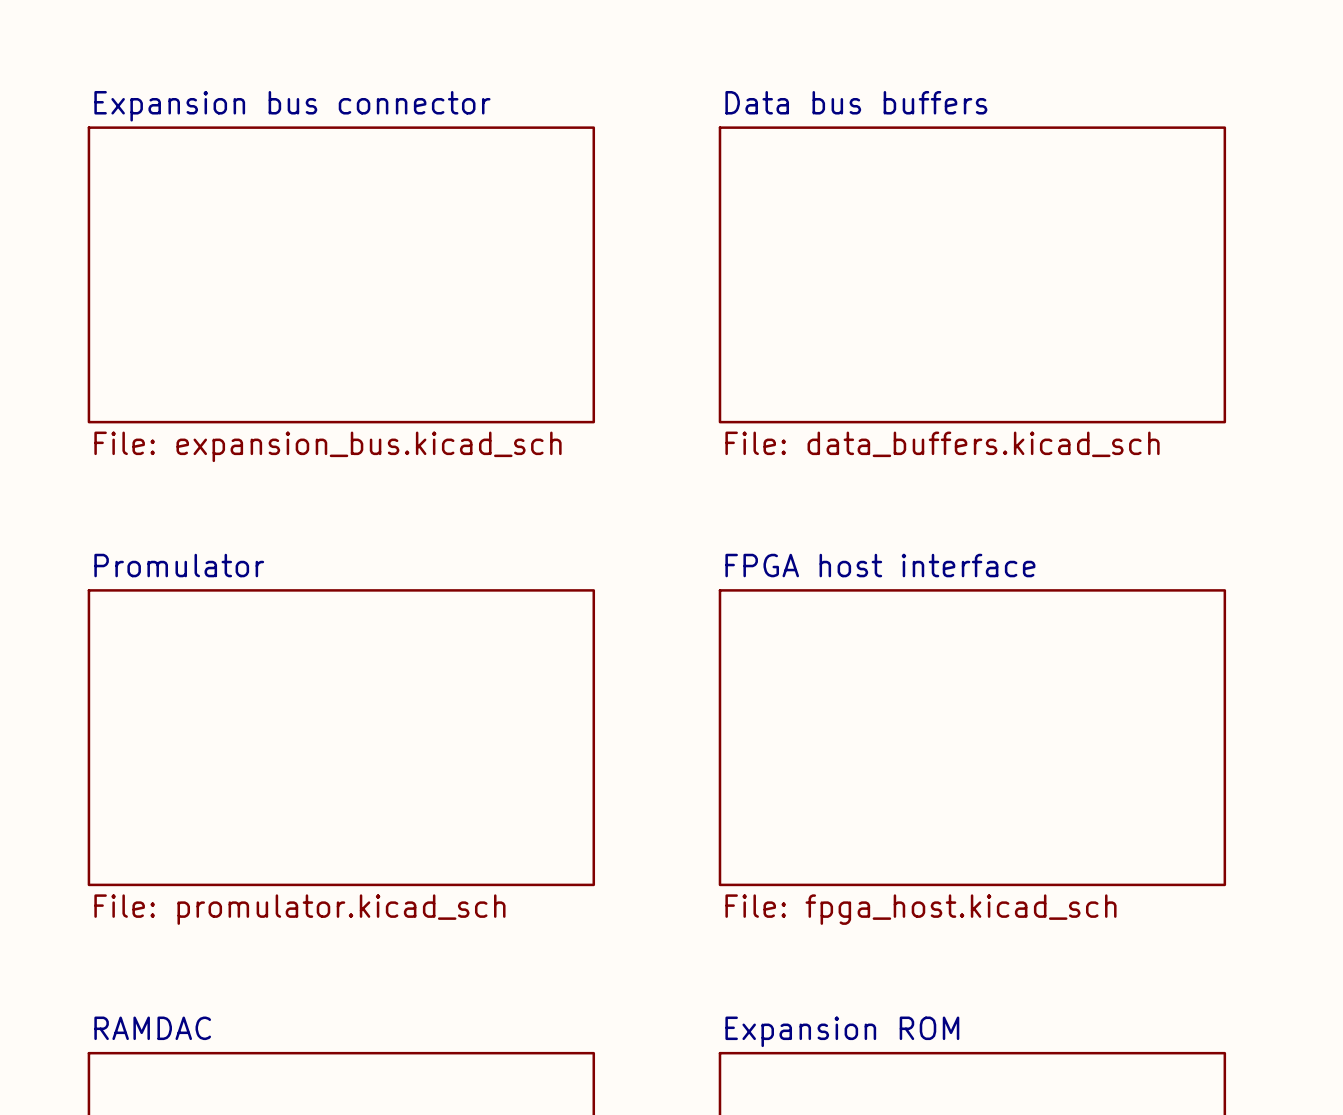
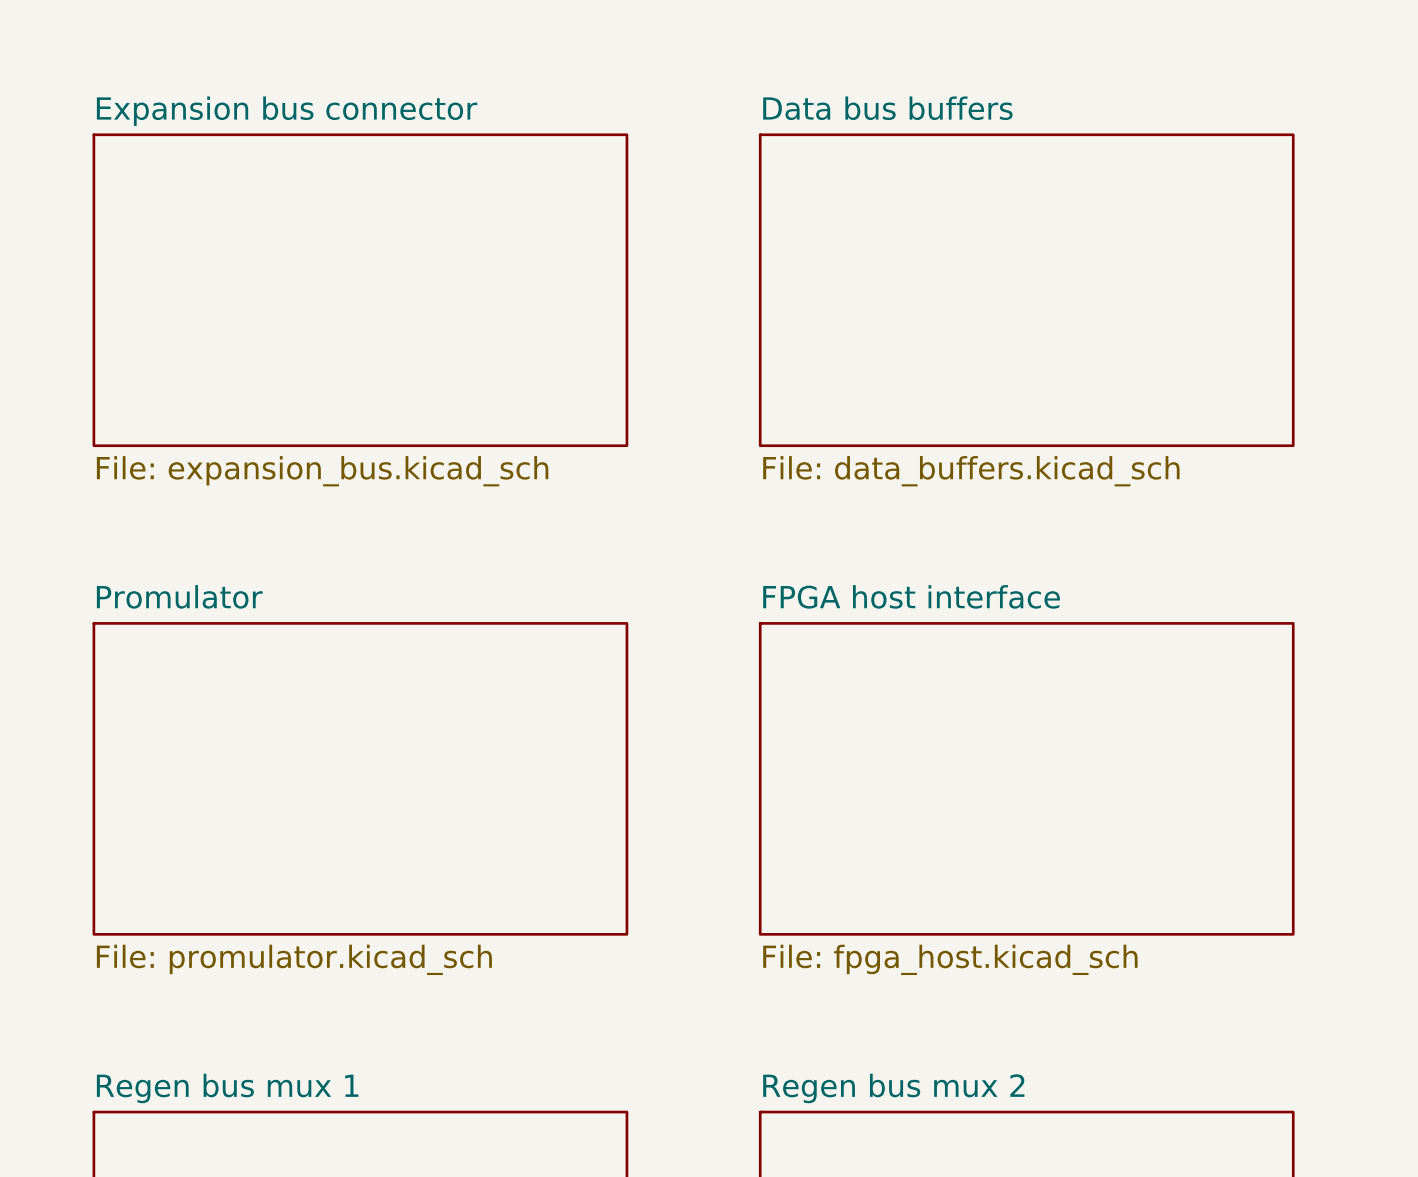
sheet RAMDAC name: RAMDAC (152, 1028) -> Regen bus mux 1 (227, 1088)
sheet Expansion ROM name: Expansion ROM (842, 1031) -> Regen bus mux 2 (893, 1088)

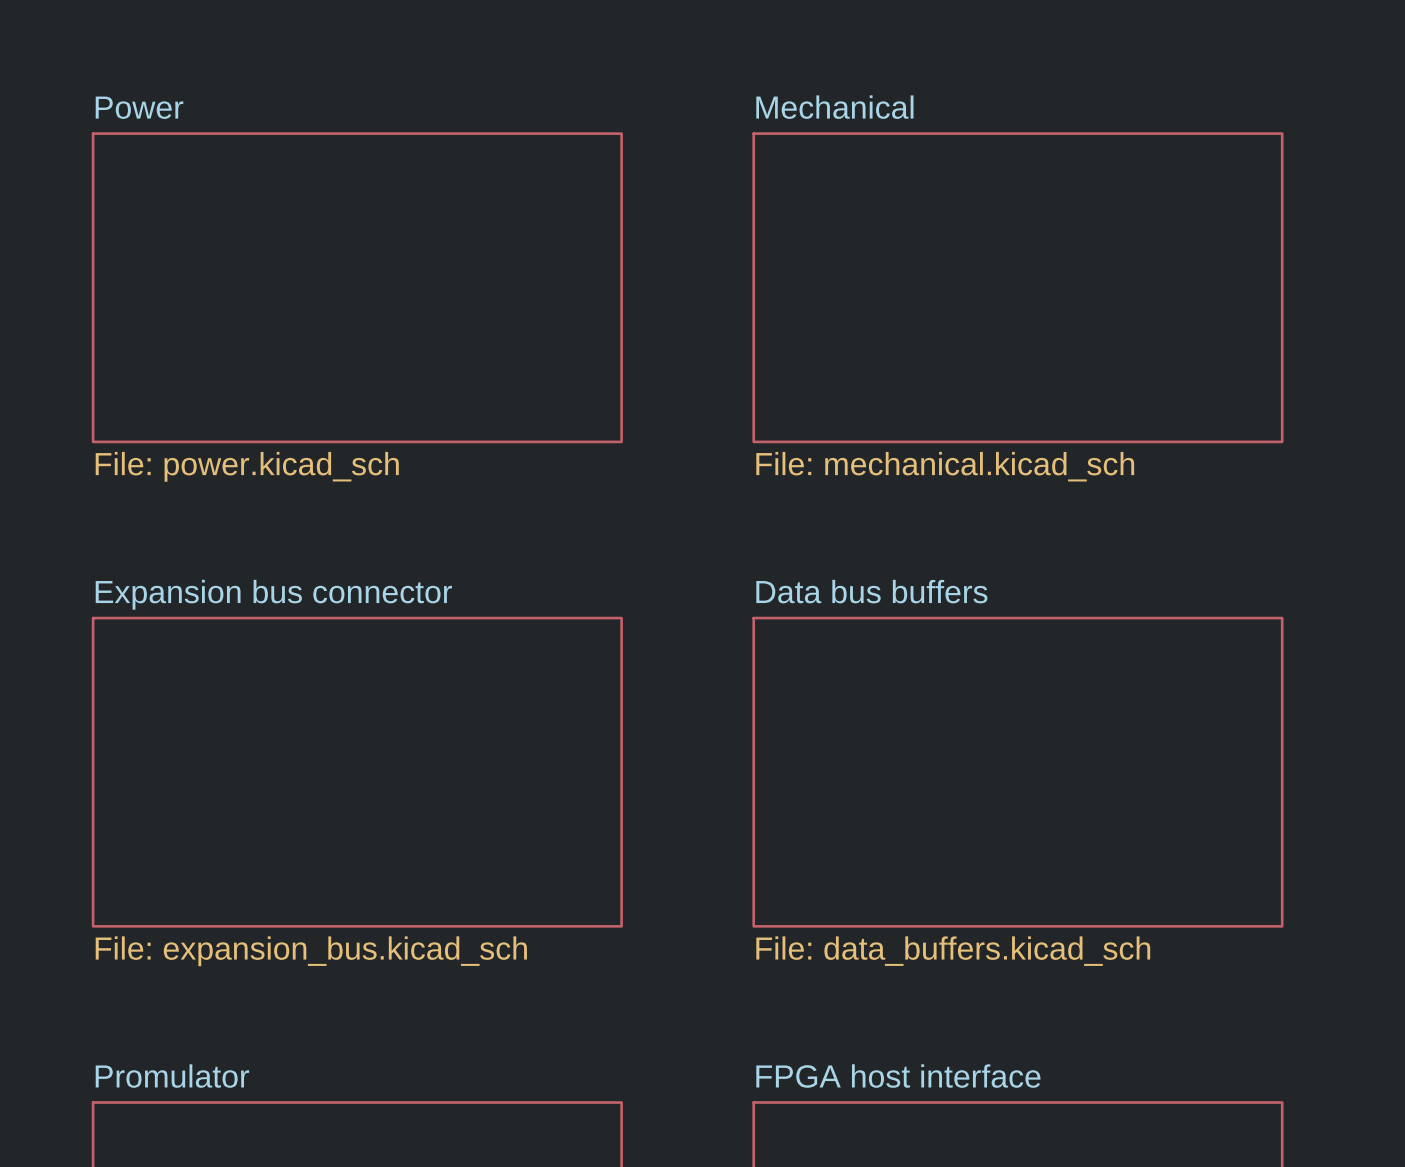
sheet Data bus buffers name: Data bus buffers (887, 108) -> Mechanical (834, 107)
sheet Expansion bus connector name: Expansion bus connector (287, 111) -> Power (139, 107)
sheet Expansion bus connector value: File: expansion_bus.kicad_sch (322, 471) -> File: power.kicad_sch (247, 466)
sheet Data bus buffers value: File: data_buffers.kicad_sch (971, 471) -> File: mechanical.kicad_sch (945, 466)
sheet Promulator name: Promulator (179, 596) -> Expansion bus connector (273, 594)
sheet FPGA host interface name: FPGA host interface (911, 596) -> Data bus buffers (871, 591)
sheet Promulator value: File: promulator.kicad_sch (294, 959) -> File: expansion_bus.kicad_sch (311, 951)
sheet FPGA host interface value: File: fpga_host.kicad_sch (950, 959) -> File: data_buffers.kicad_sch (953, 951)
sheet Regen bus mux 1 name: Regen bus mux 1 (227, 1088) -> Promulator (172, 1076)
sheet Regen bus mux 2 name: Regen bus mux 2 (893, 1088) -> FPGA host interface (898, 1076)

